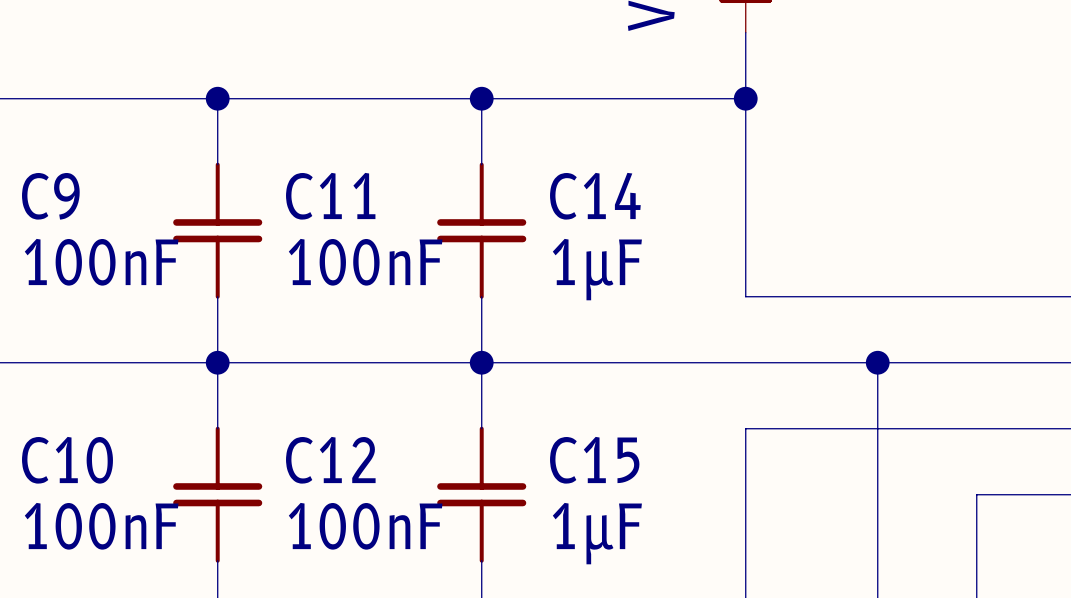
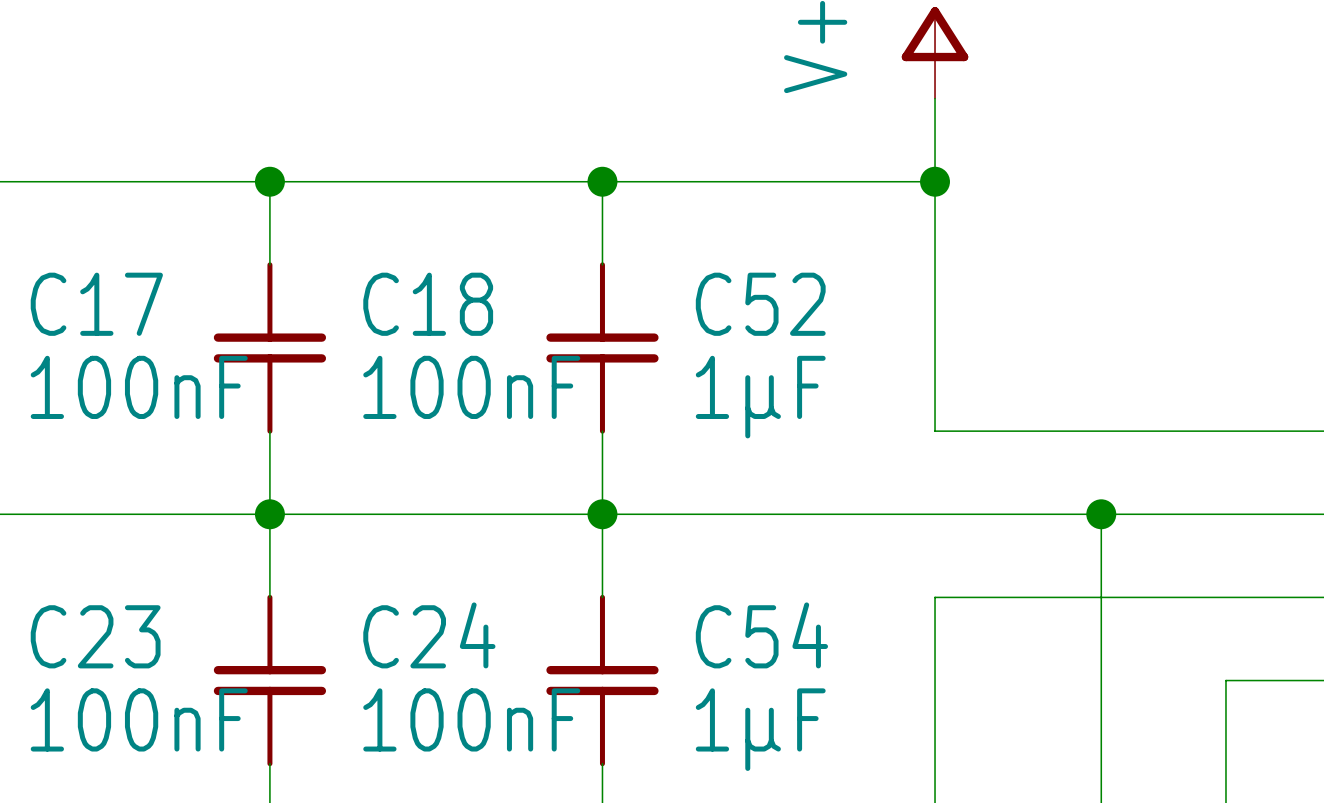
C9 name: C9 (50, 196) -> C17 (96, 304)
C11 name: C11 (330, 196) -> C18 (428, 304)
C14 name: C14 (595, 196) -> C52 (760, 304)
C10 name: C10 (67, 460) -> C23 (95, 636)
C12 name: C12 (330, 460) -> C24 (429, 635)
C15 name: C15 (594, 460) -> C54 (761, 635)

